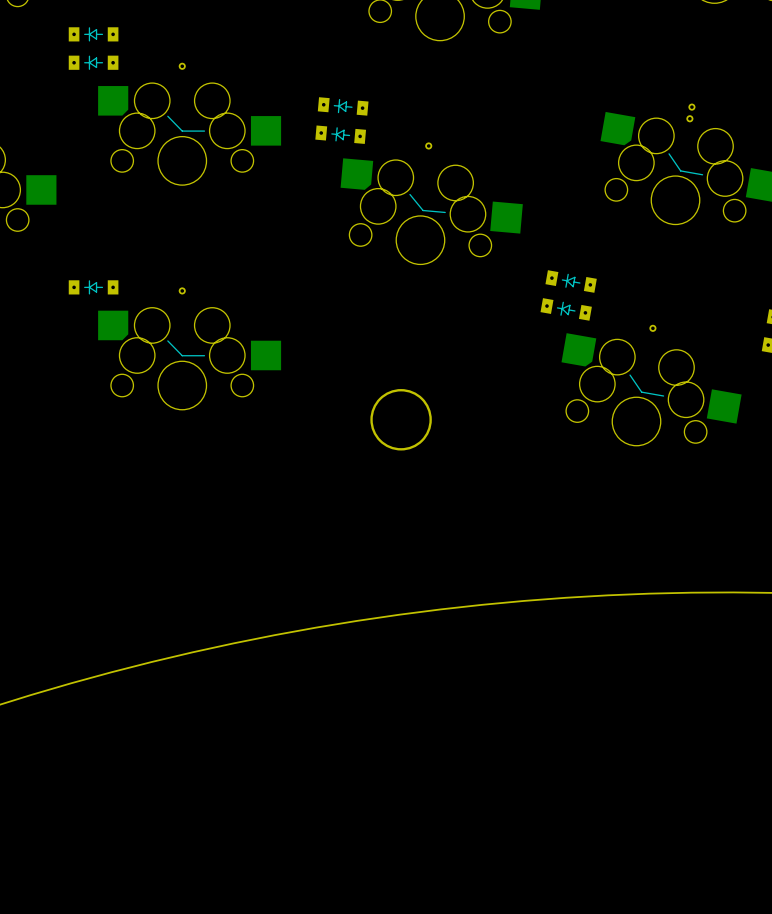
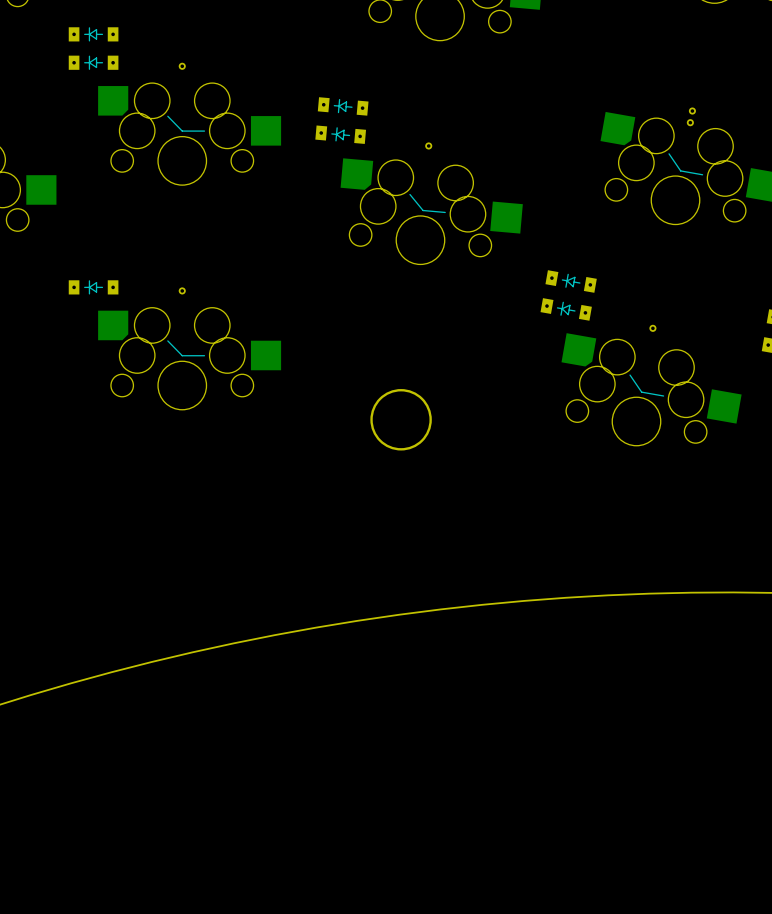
part: (691, 107) -> none
part: none -> (692, 111)
part: (689, 118) -> none
part: none -> (690, 122)

